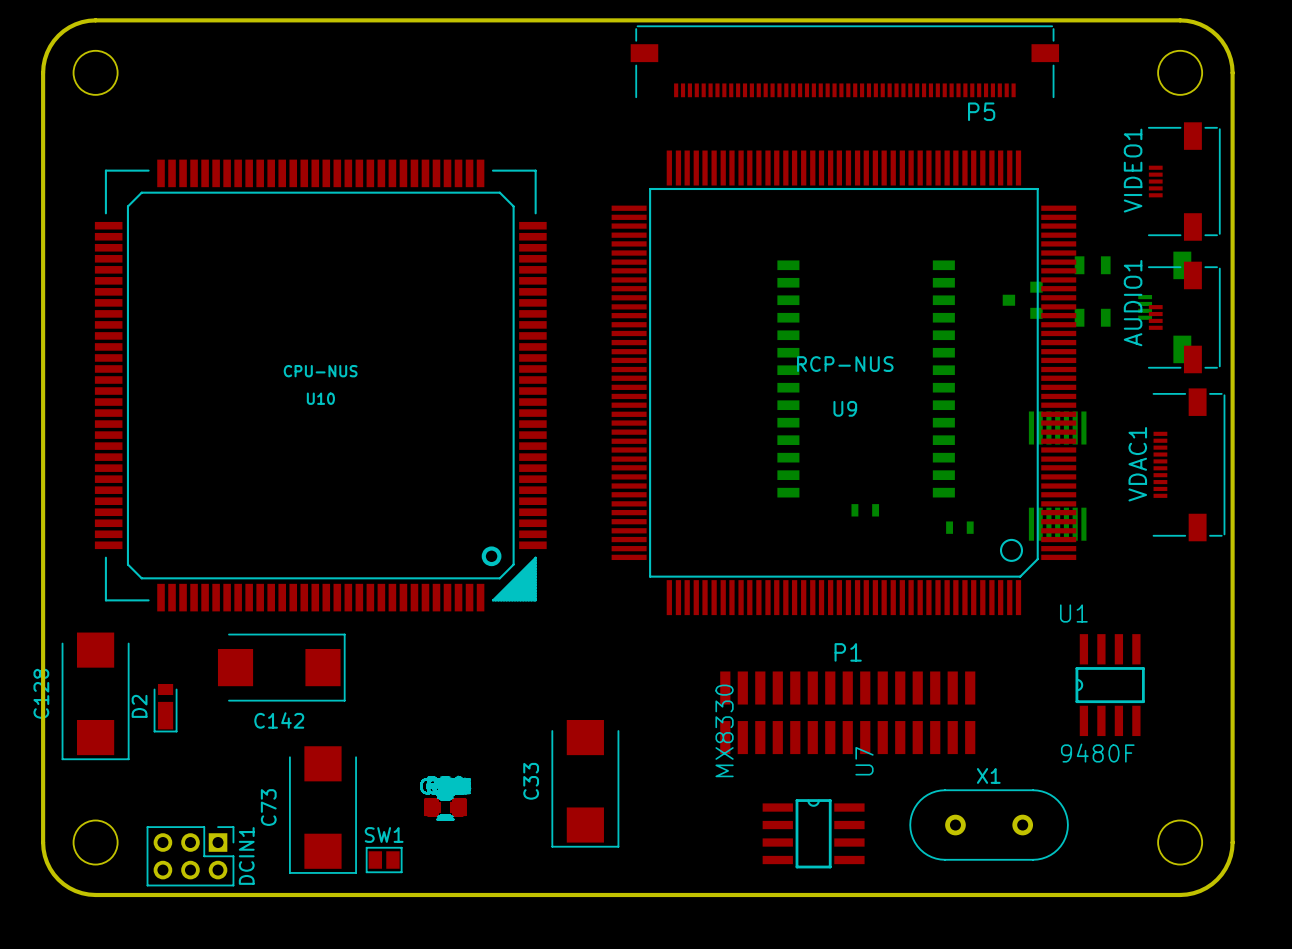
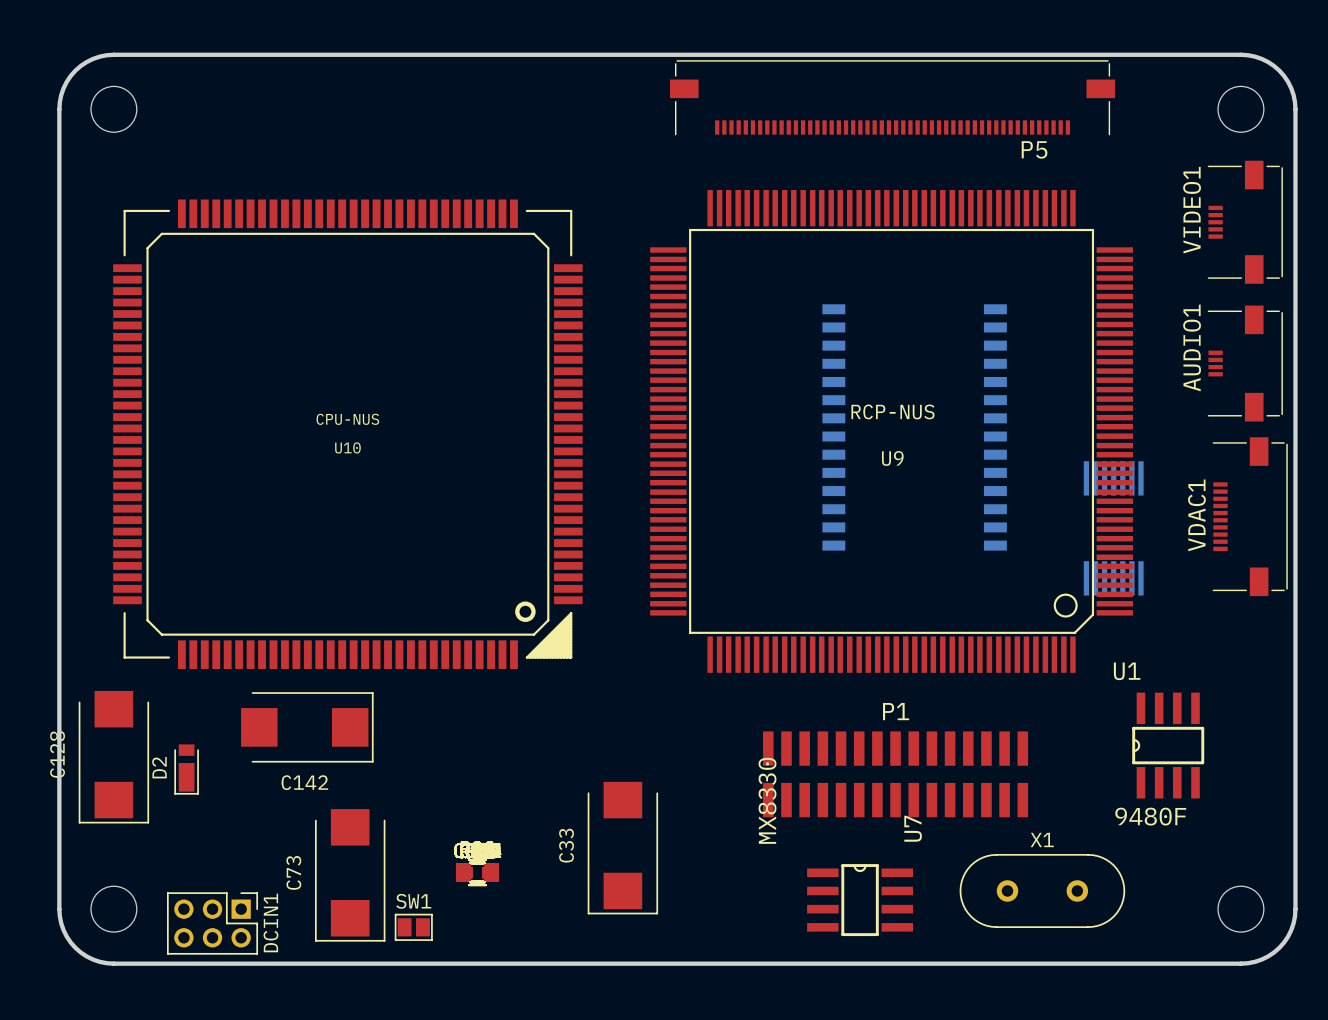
part: (1092, 265) -> none
part: (1022, 300) -> none
part: (1164, 307) -> none
part: (1092, 317) -> none
part: (865, 510) -> none
part: (959, 527) -> none

